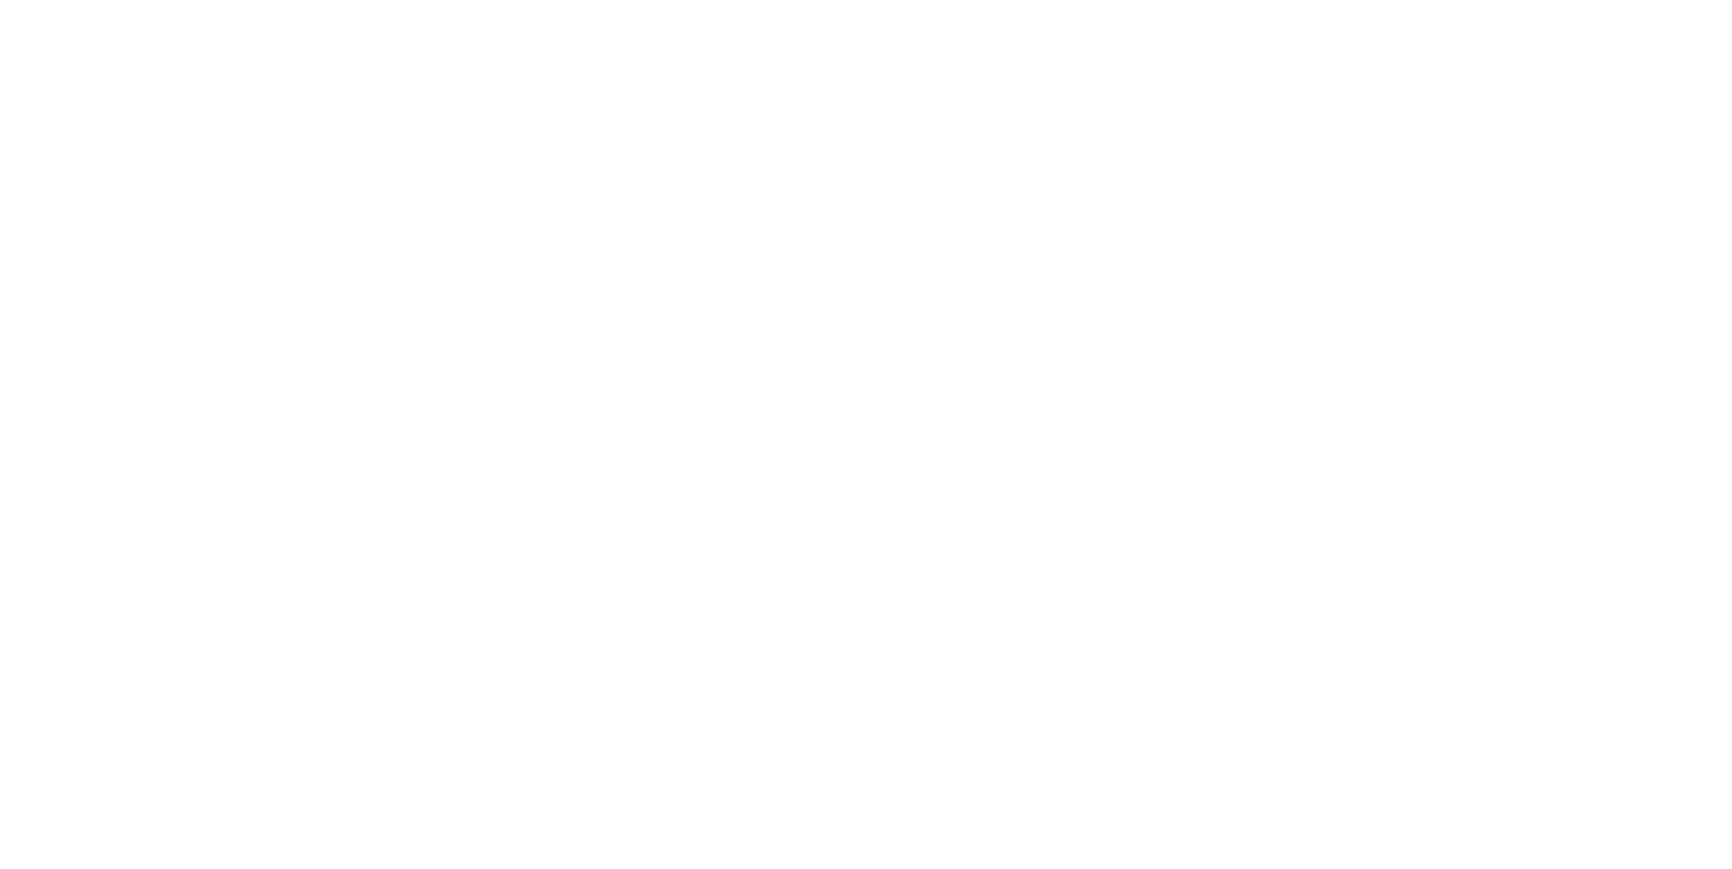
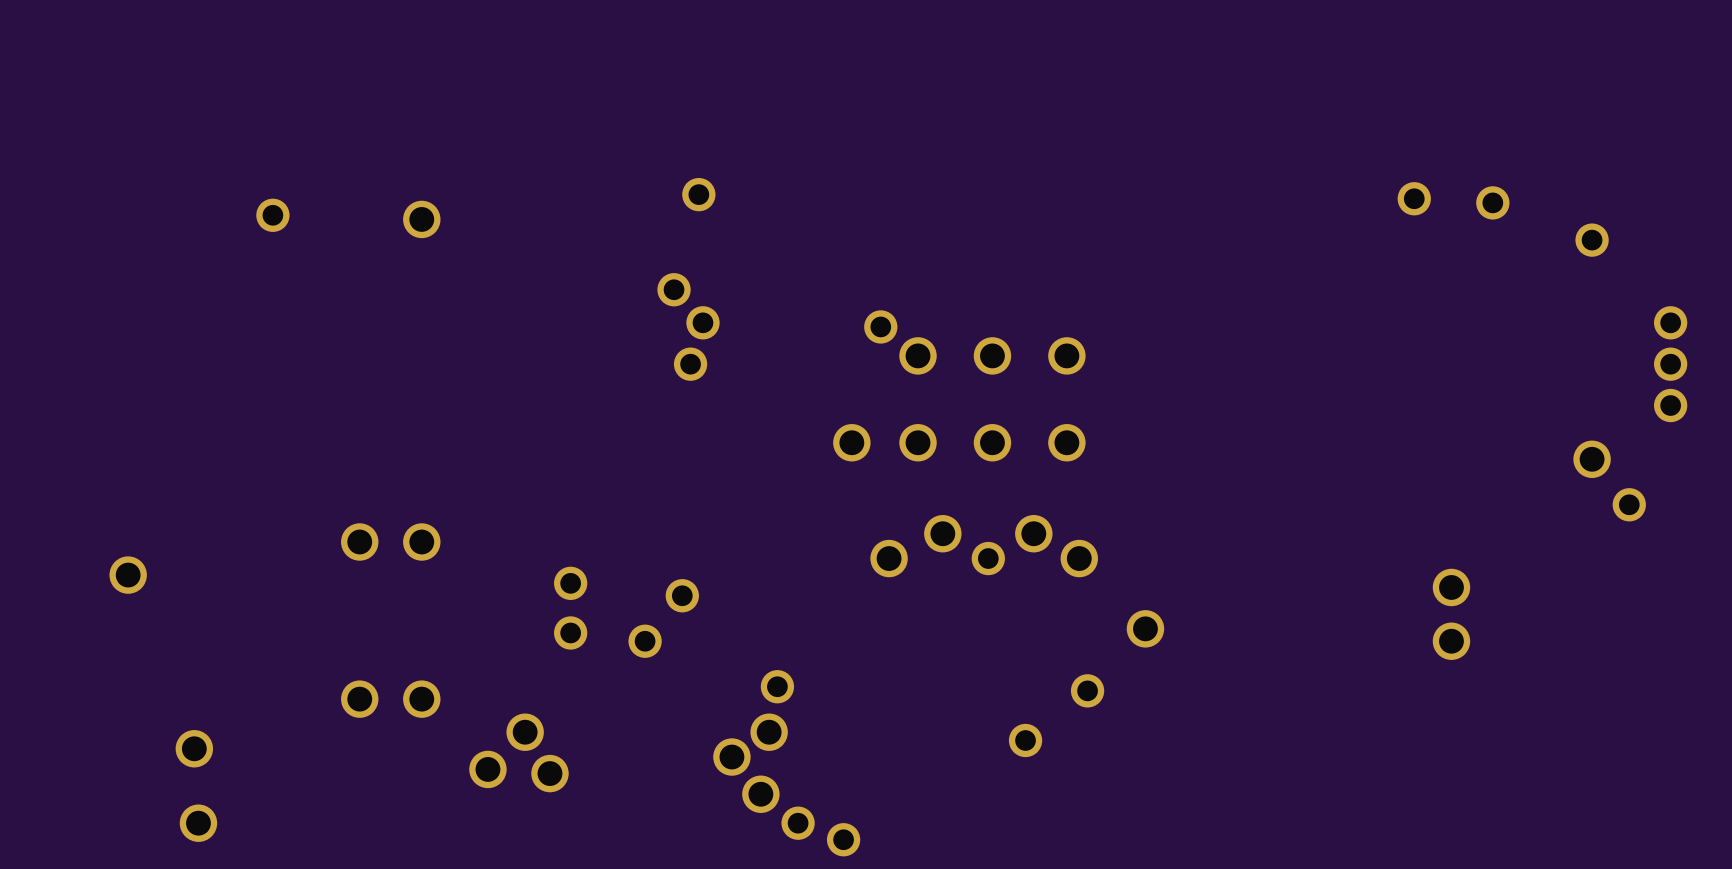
via: none -> (698, 194)
via: none -> (1414, 198)
via: none -> (1492, 202)
via: none -> (272, 215)
via: none -> (421, 219)
via: none -> (1592, 240)
via: none -> (674, 289)
via: none -> (702, 322)
via: none -> (1670, 322)
via: none -> (880, 326)
via: none -> (918, 355)
via: none -> (992, 355)
via: none -> (1066, 355)
via: none -> (690, 364)
via: none -> (1670, 364)
via: none -> (1670, 405)
via: none -> (851, 442)
via: none -> (918, 442)
via: none -> (992, 442)
via: none -> (1066, 442)
via: none -> (1592, 459)
via: none -> (1629, 504)
via: none -> (942, 533)
via: none -> (1033, 533)
via: none -> (359, 541)
via: none -> (421, 541)
via: none -> (889, 558)
via: none -> (988, 558)
via: none -> (1079, 558)
via: none -> (128, 575)
via: none -> (570, 583)
via: none -> (1451, 587)
via: none -> (682, 595)
via: none -> (1145, 628)
via: none -> (570, 632)
via: none -> (645, 641)
via: none -> (1451, 641)
via: none -> (777, 686)
via: none -> (1087, 690)
via: none -> (359, 699)
via: none -> (421, 699)
via: none -> (525, 732)
via: none -> (769, 732)
via: none -> (1025, 740)
via: none -> (194, 748)
via: none -> (731, 757)
via: none -> (487, 769)
via: none -> (549, 773)
via: none -> (760, 794)
via: none -> (198, 823)
via: none -> (798, 823)
via: none -> (843, 839)

